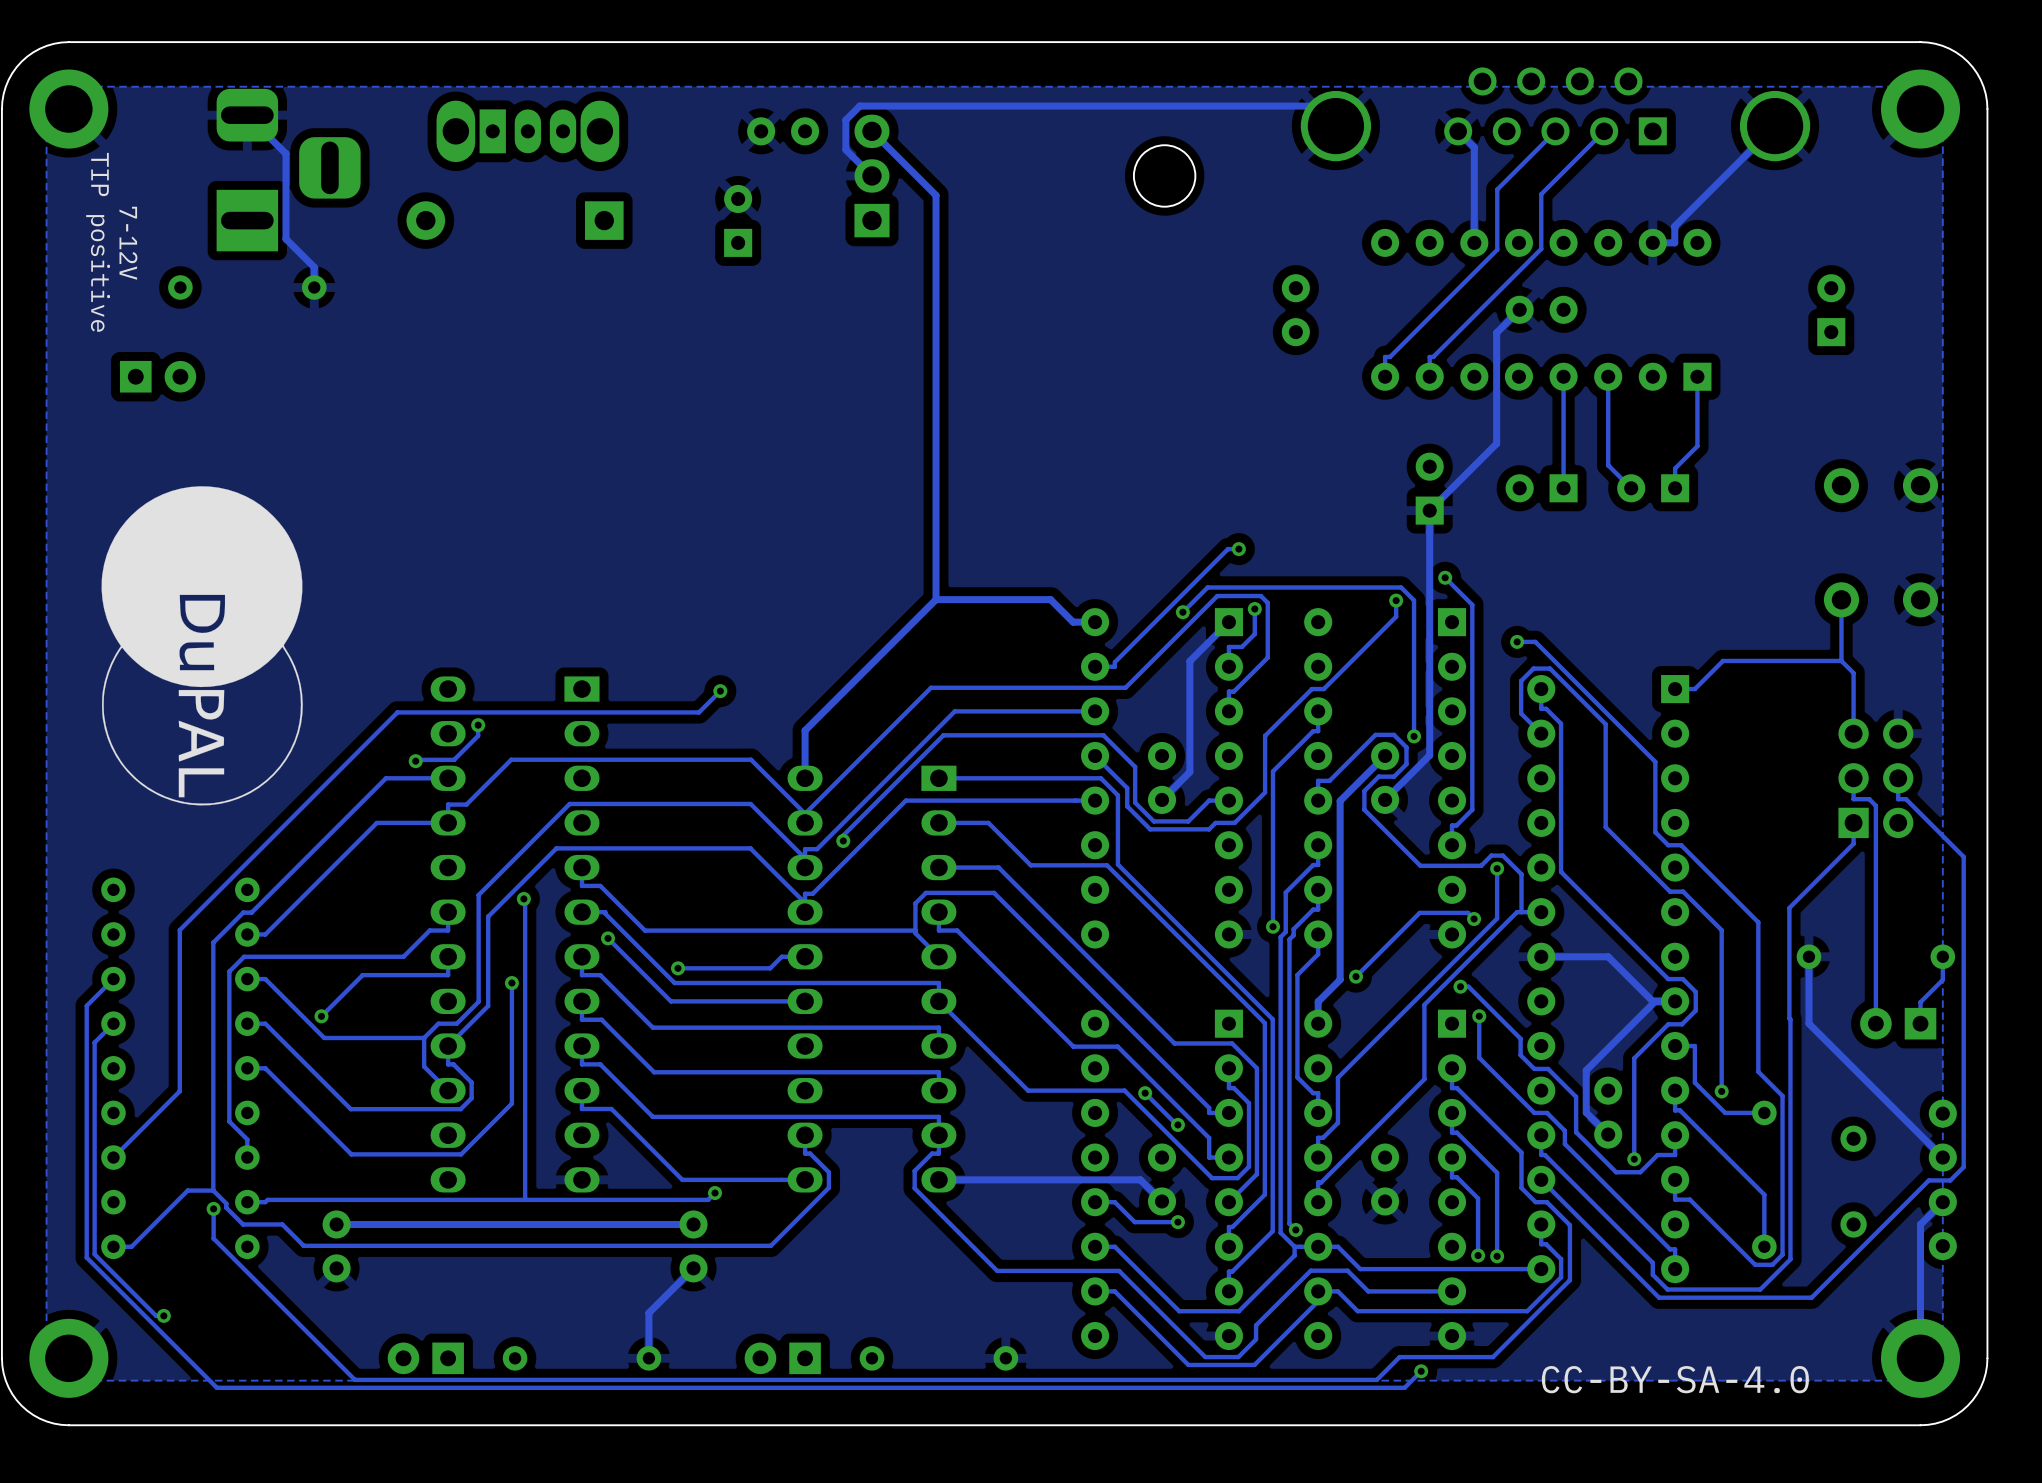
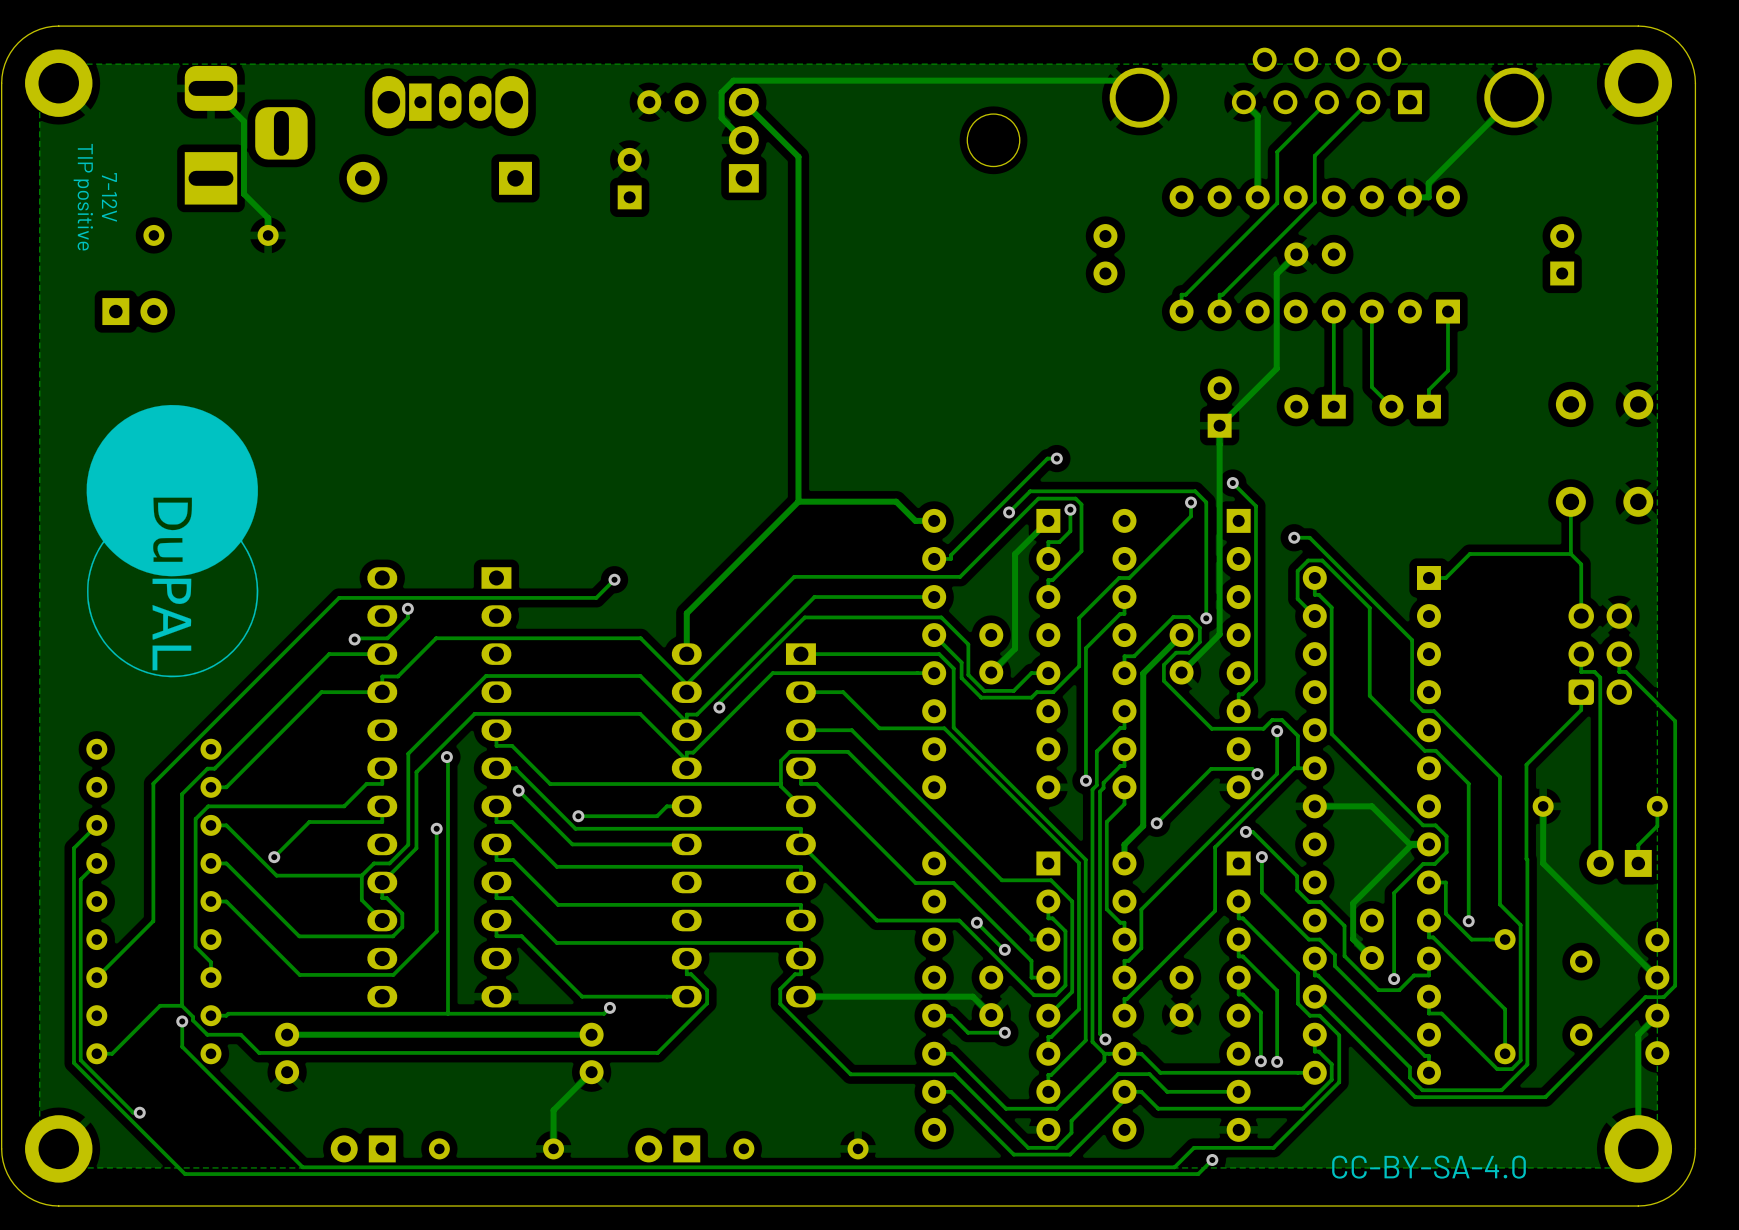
part footprint: [1838, 718, 1914, 839] -> [1568, 603, 1633, 705]

